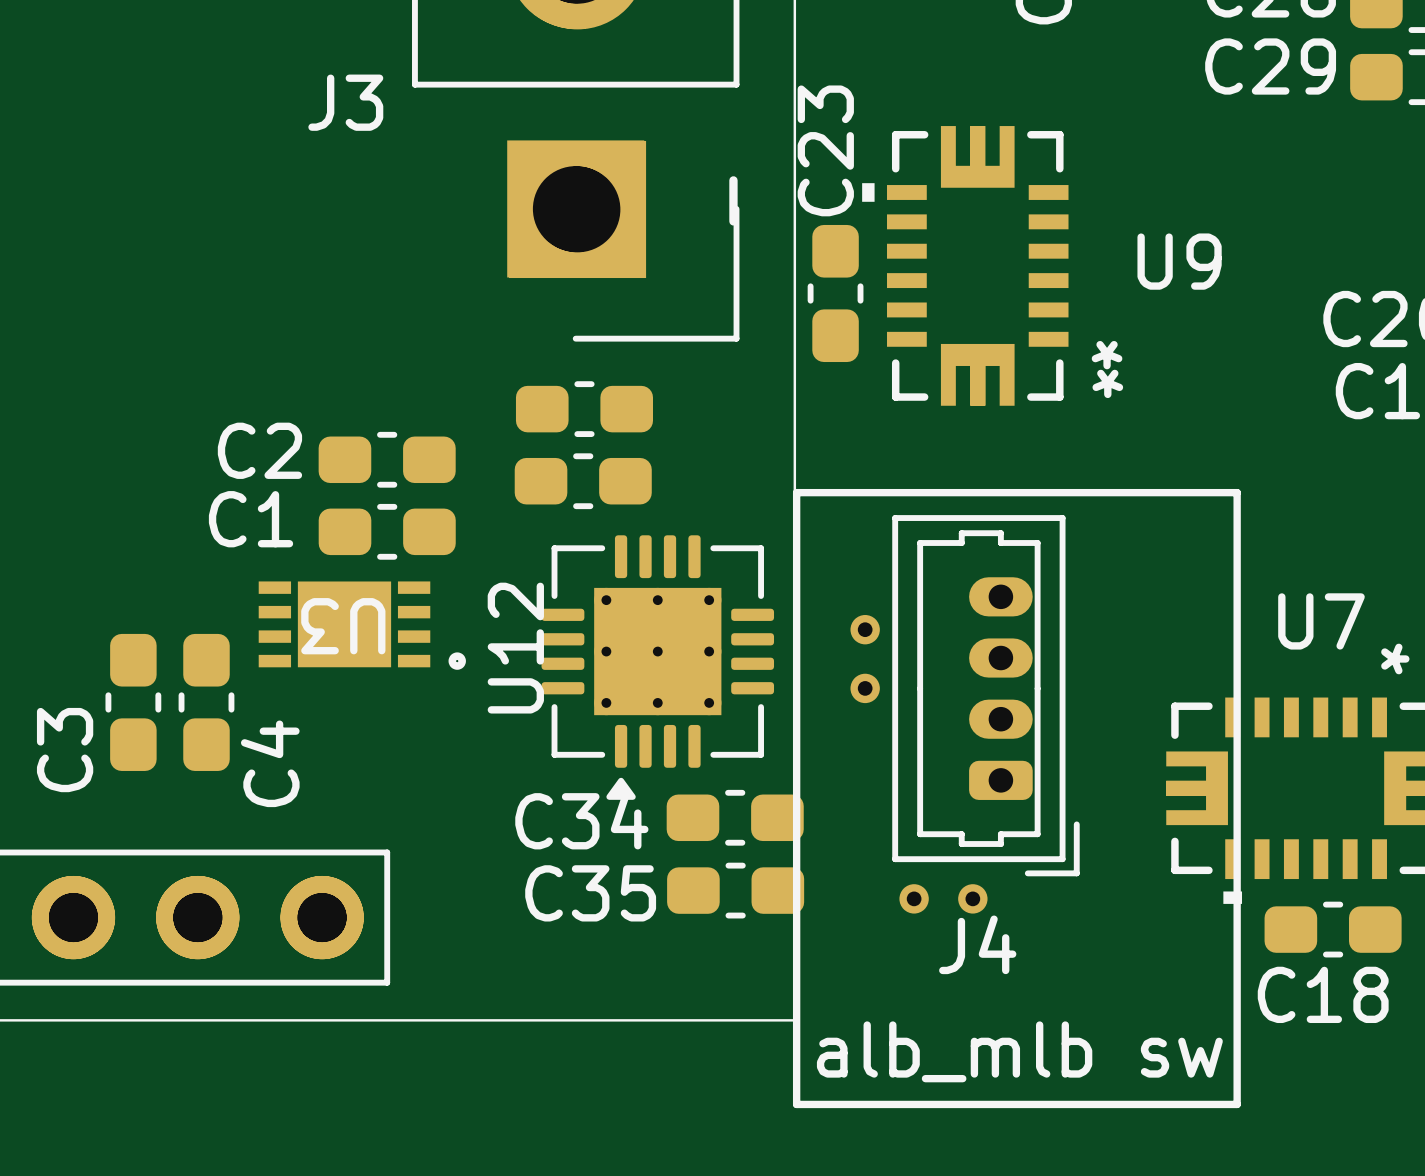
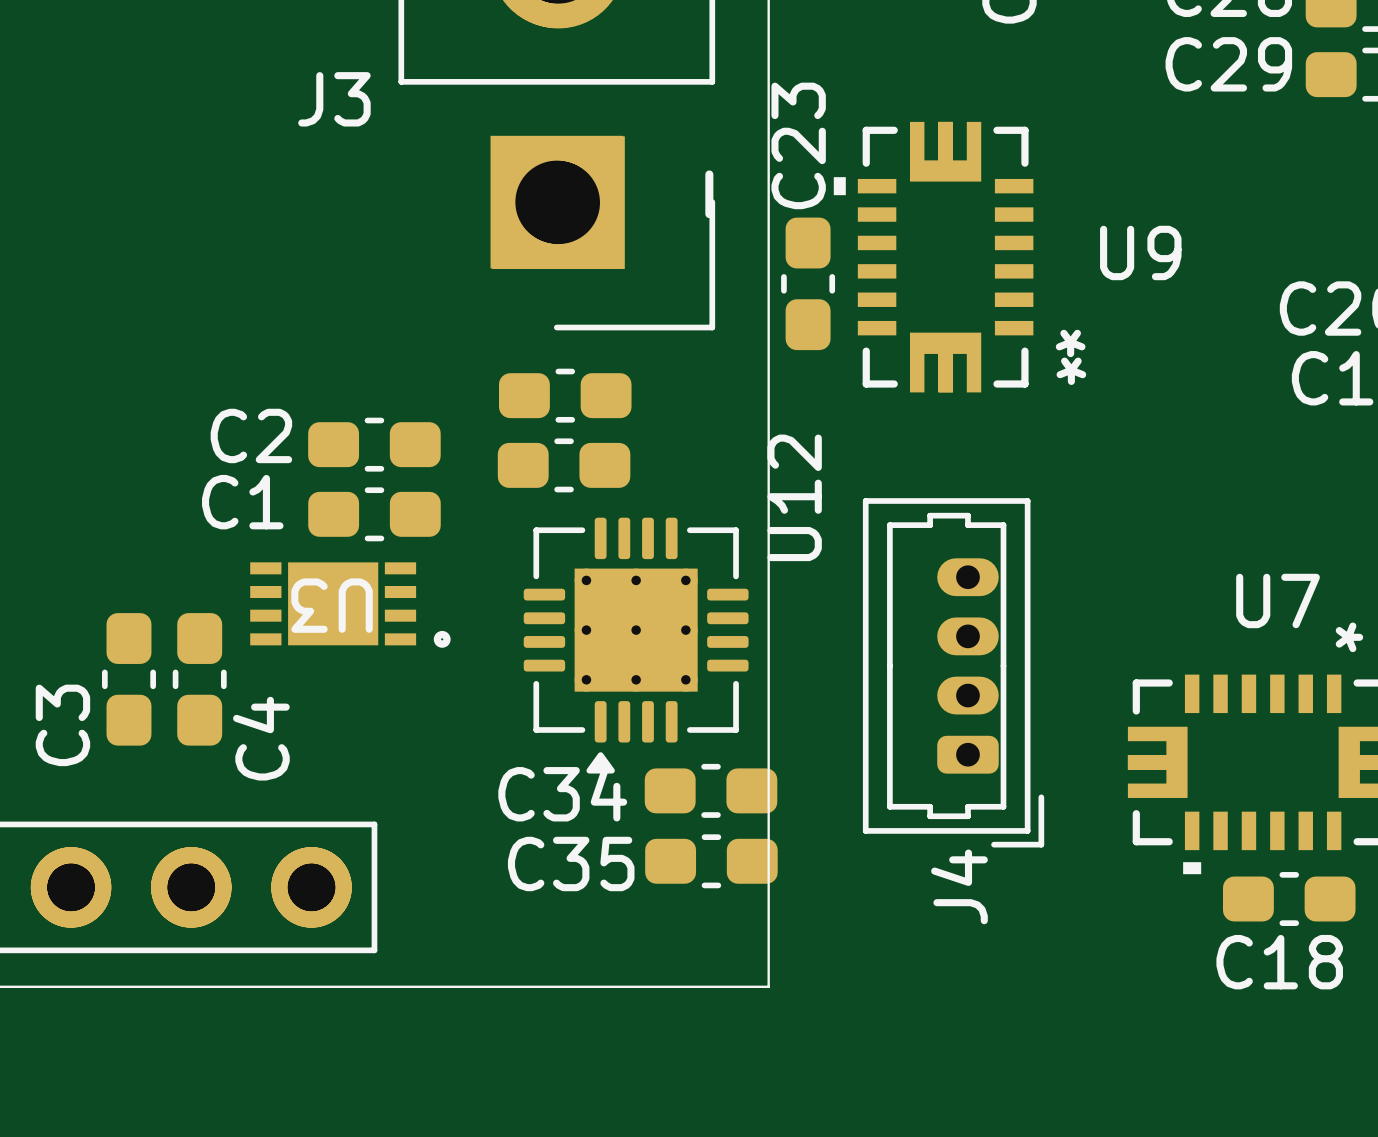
line: (796, 492) (1237, 492) (1237, 1104) (796, 1104) (796, 492) -> none
U12 name position: U12 (515, 648) -> U12 (794, 497)
part: (865, 659) -> none
part: (943, 898) -> none
J4 name rotation: 0° (977, 944) -> 90° counterclockwise (959, 886)
text: alb_mlb sw (1019, 1051) -> none

